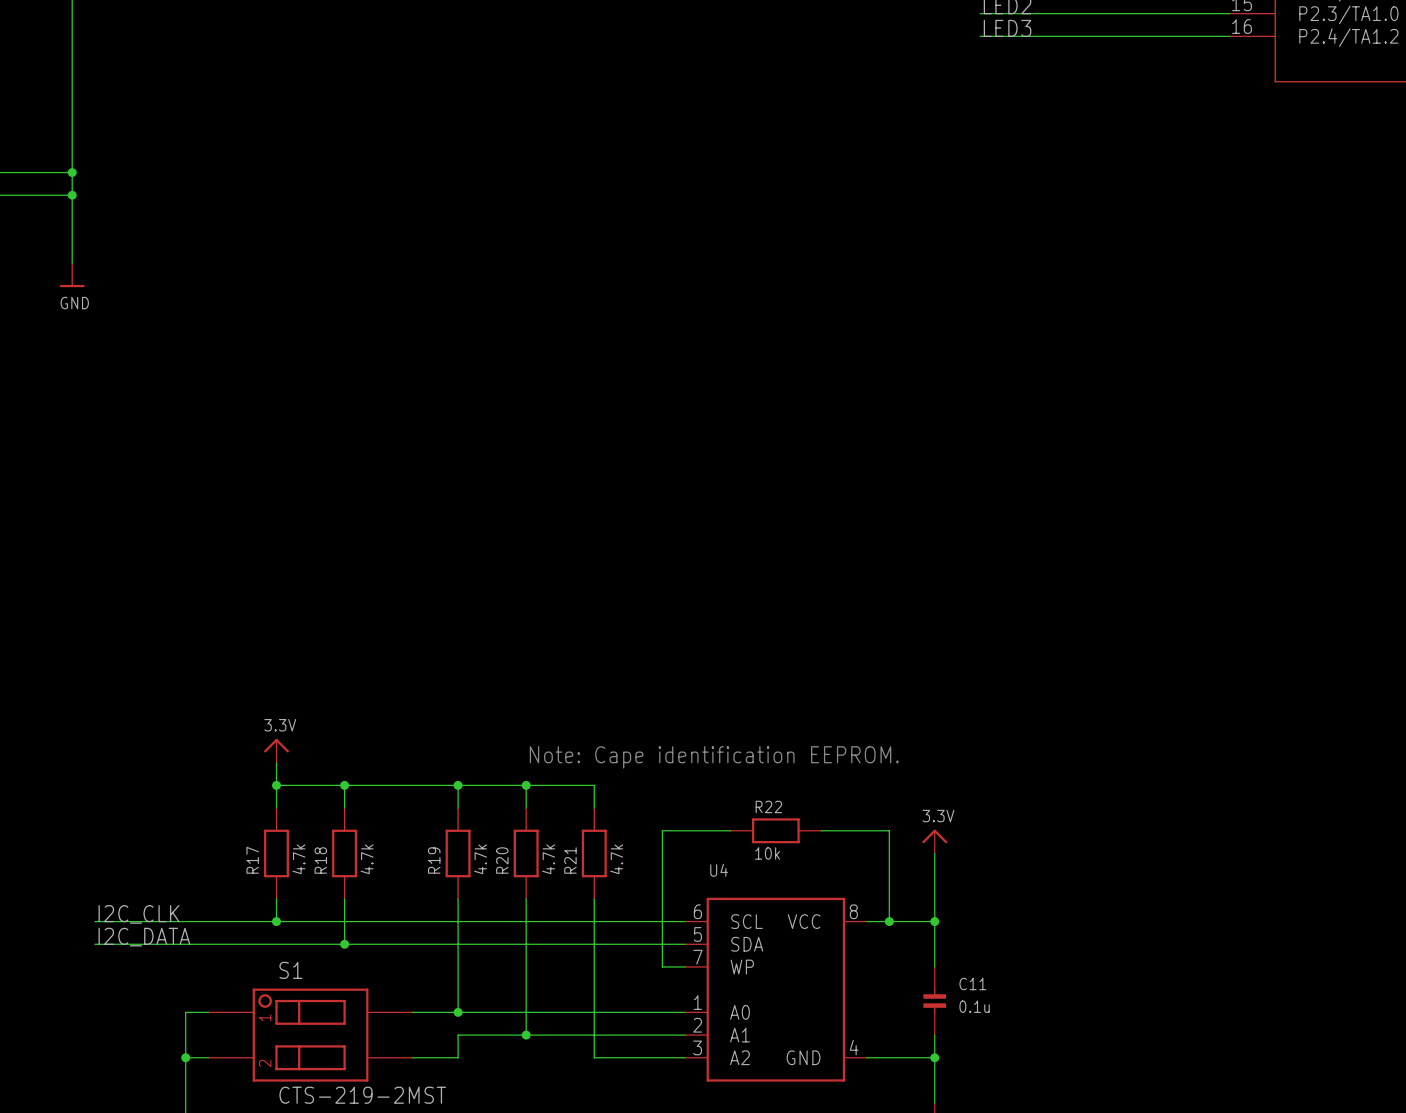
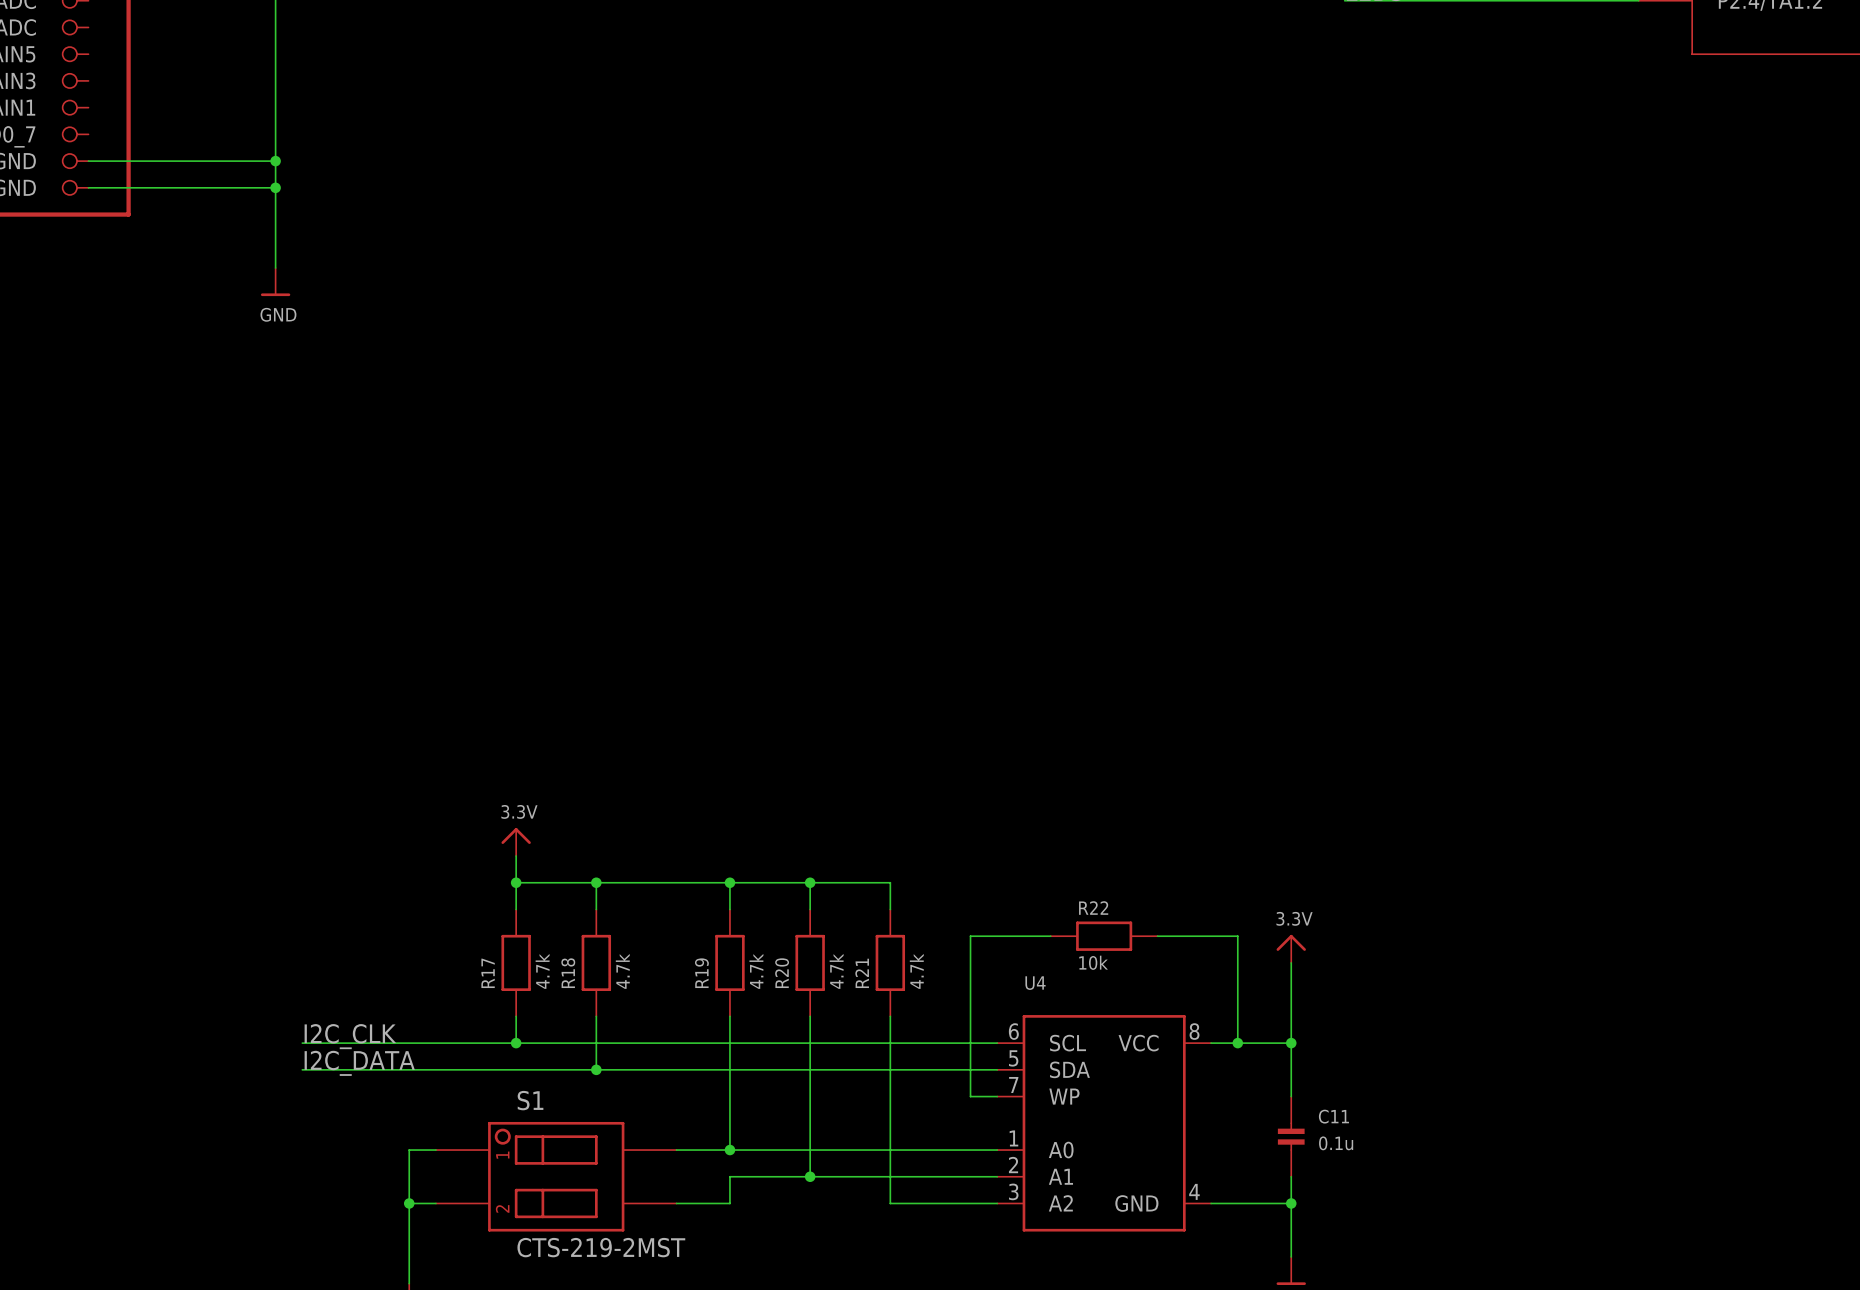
text: Note: Cape identification EEPROM. (714, 757) -> none

